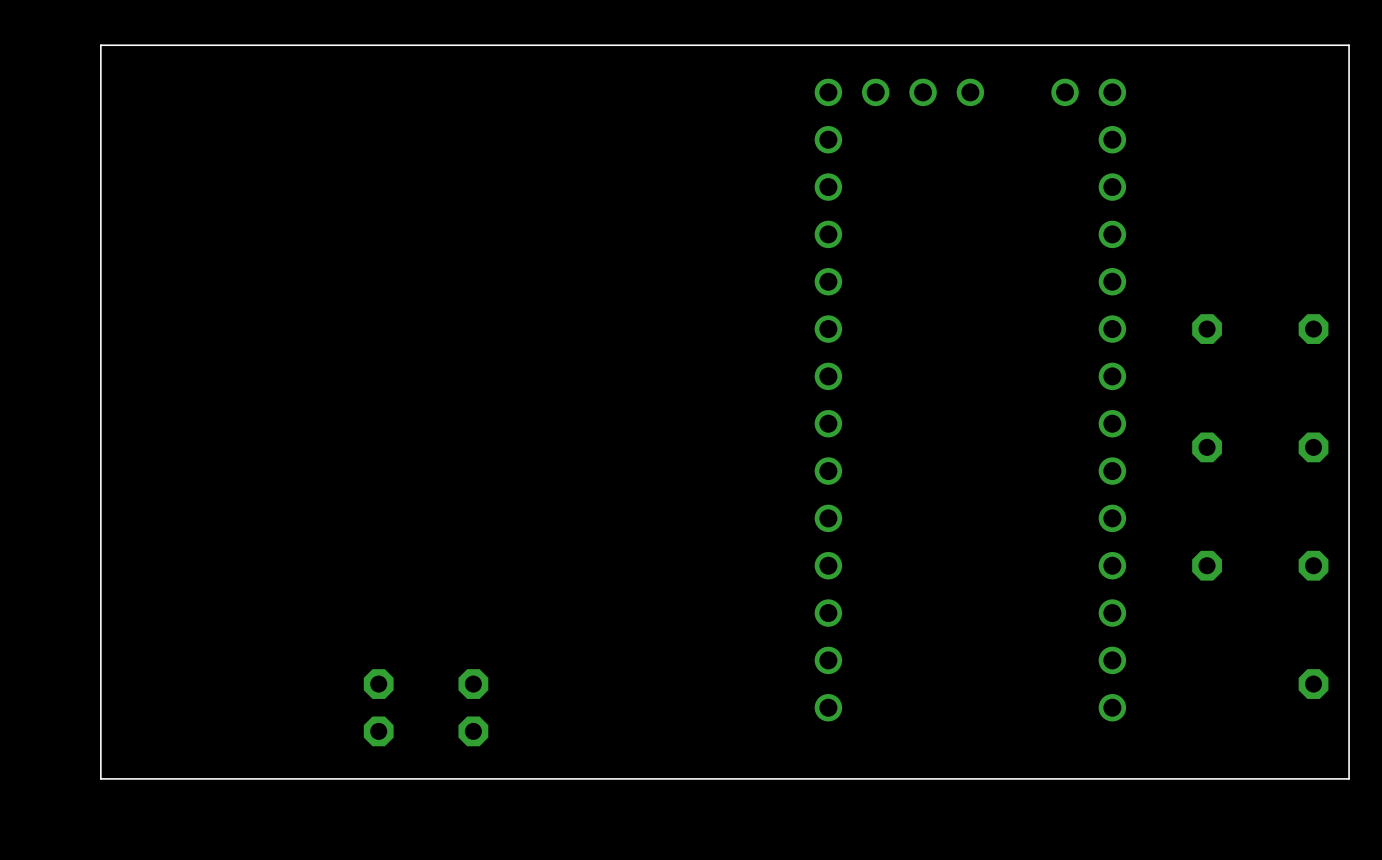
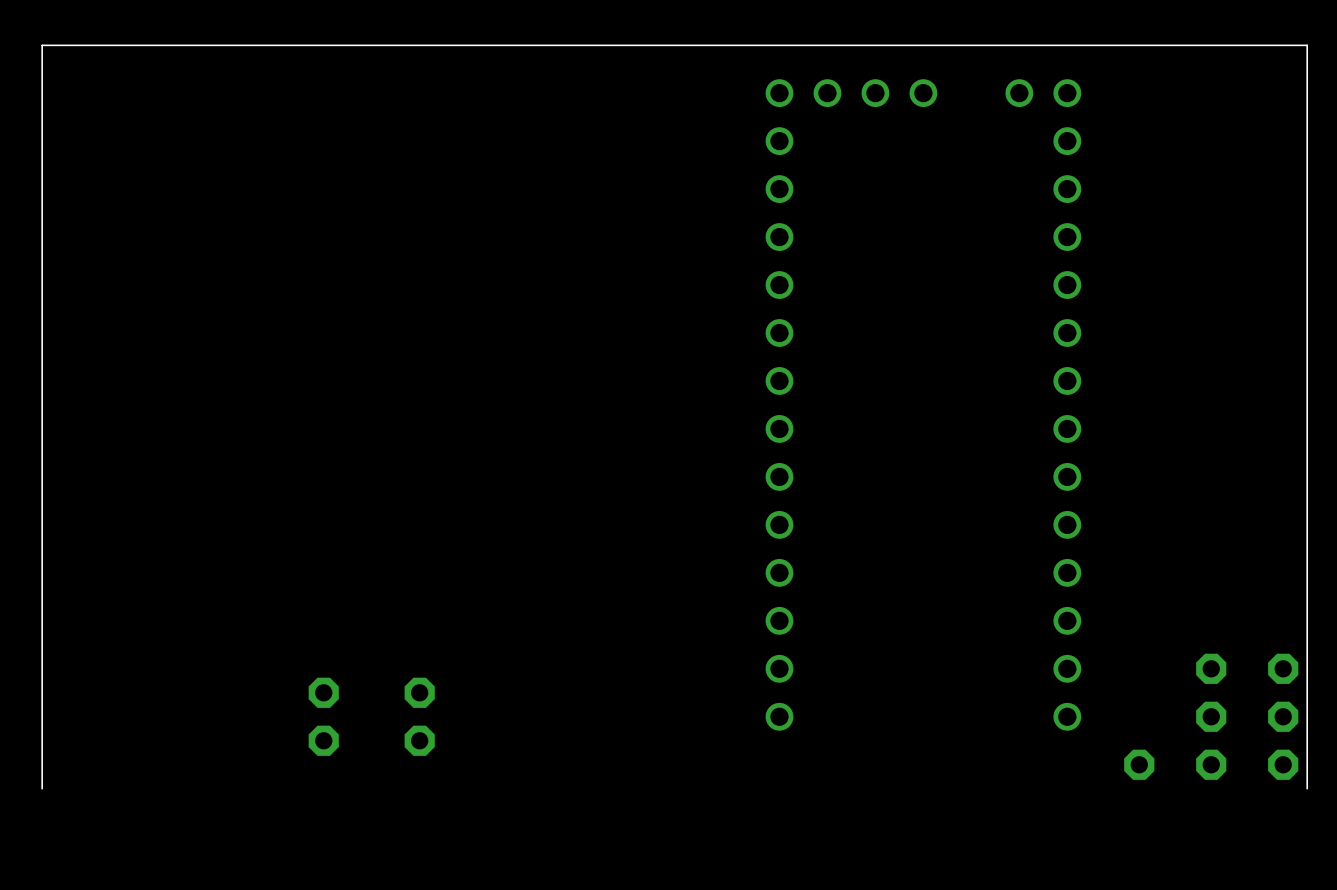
part: (1207, 329) -> none
part: (1313, 329) -> none
part: (1207, 447) -> none
part: (1313, 447) -> none
part: (1207, 565) -> none
part: (1313, 565) -> none
part: none -> (1211, 668)
part: none -> (1283, 668)
part: (1313, 684) -> none
part: none -> (1211, 716)
part: none -> (1283, 716)
part: none -> (1139, 764)
part: none -> (1211, 764)
part: none -> (1283, 764)
board edge: (1349, 778) (100, 778) -> none

